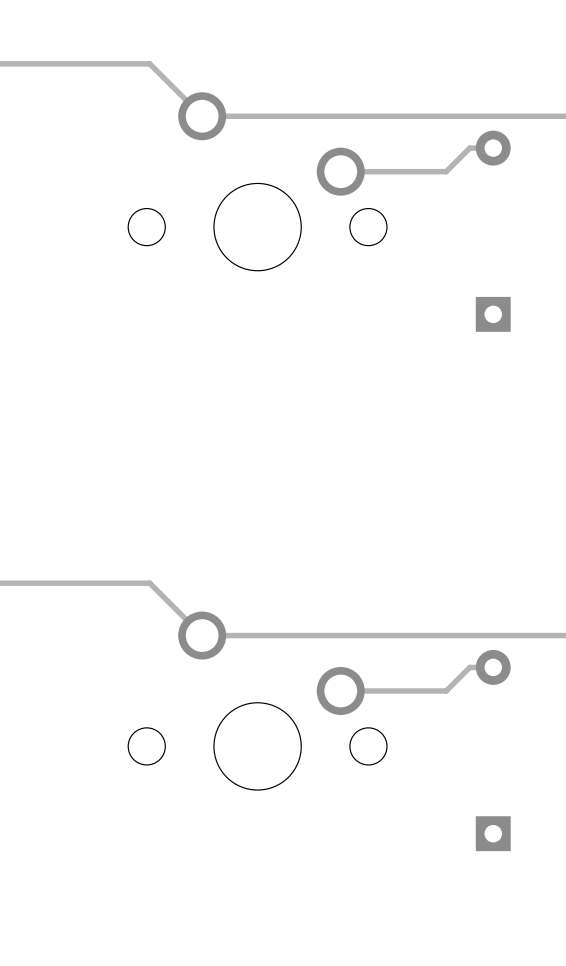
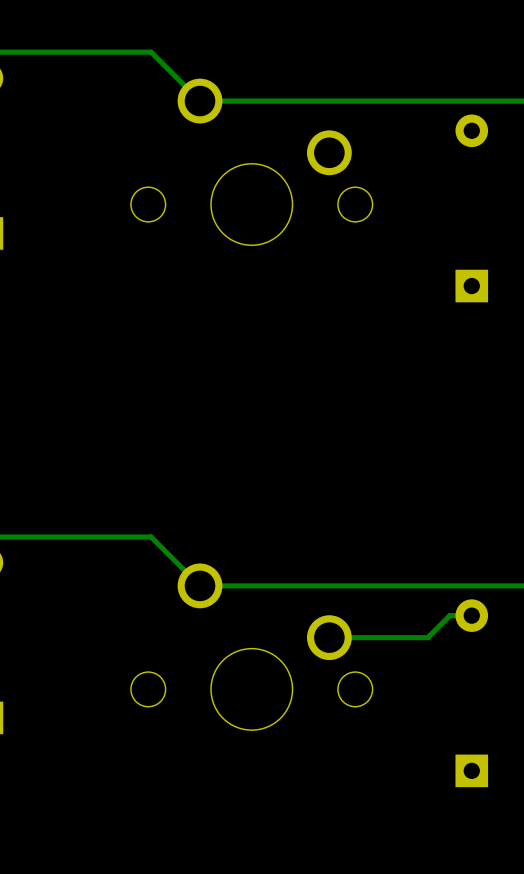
track: (493, 148) (469, 148) (446, 171) (340, 171) -> none

